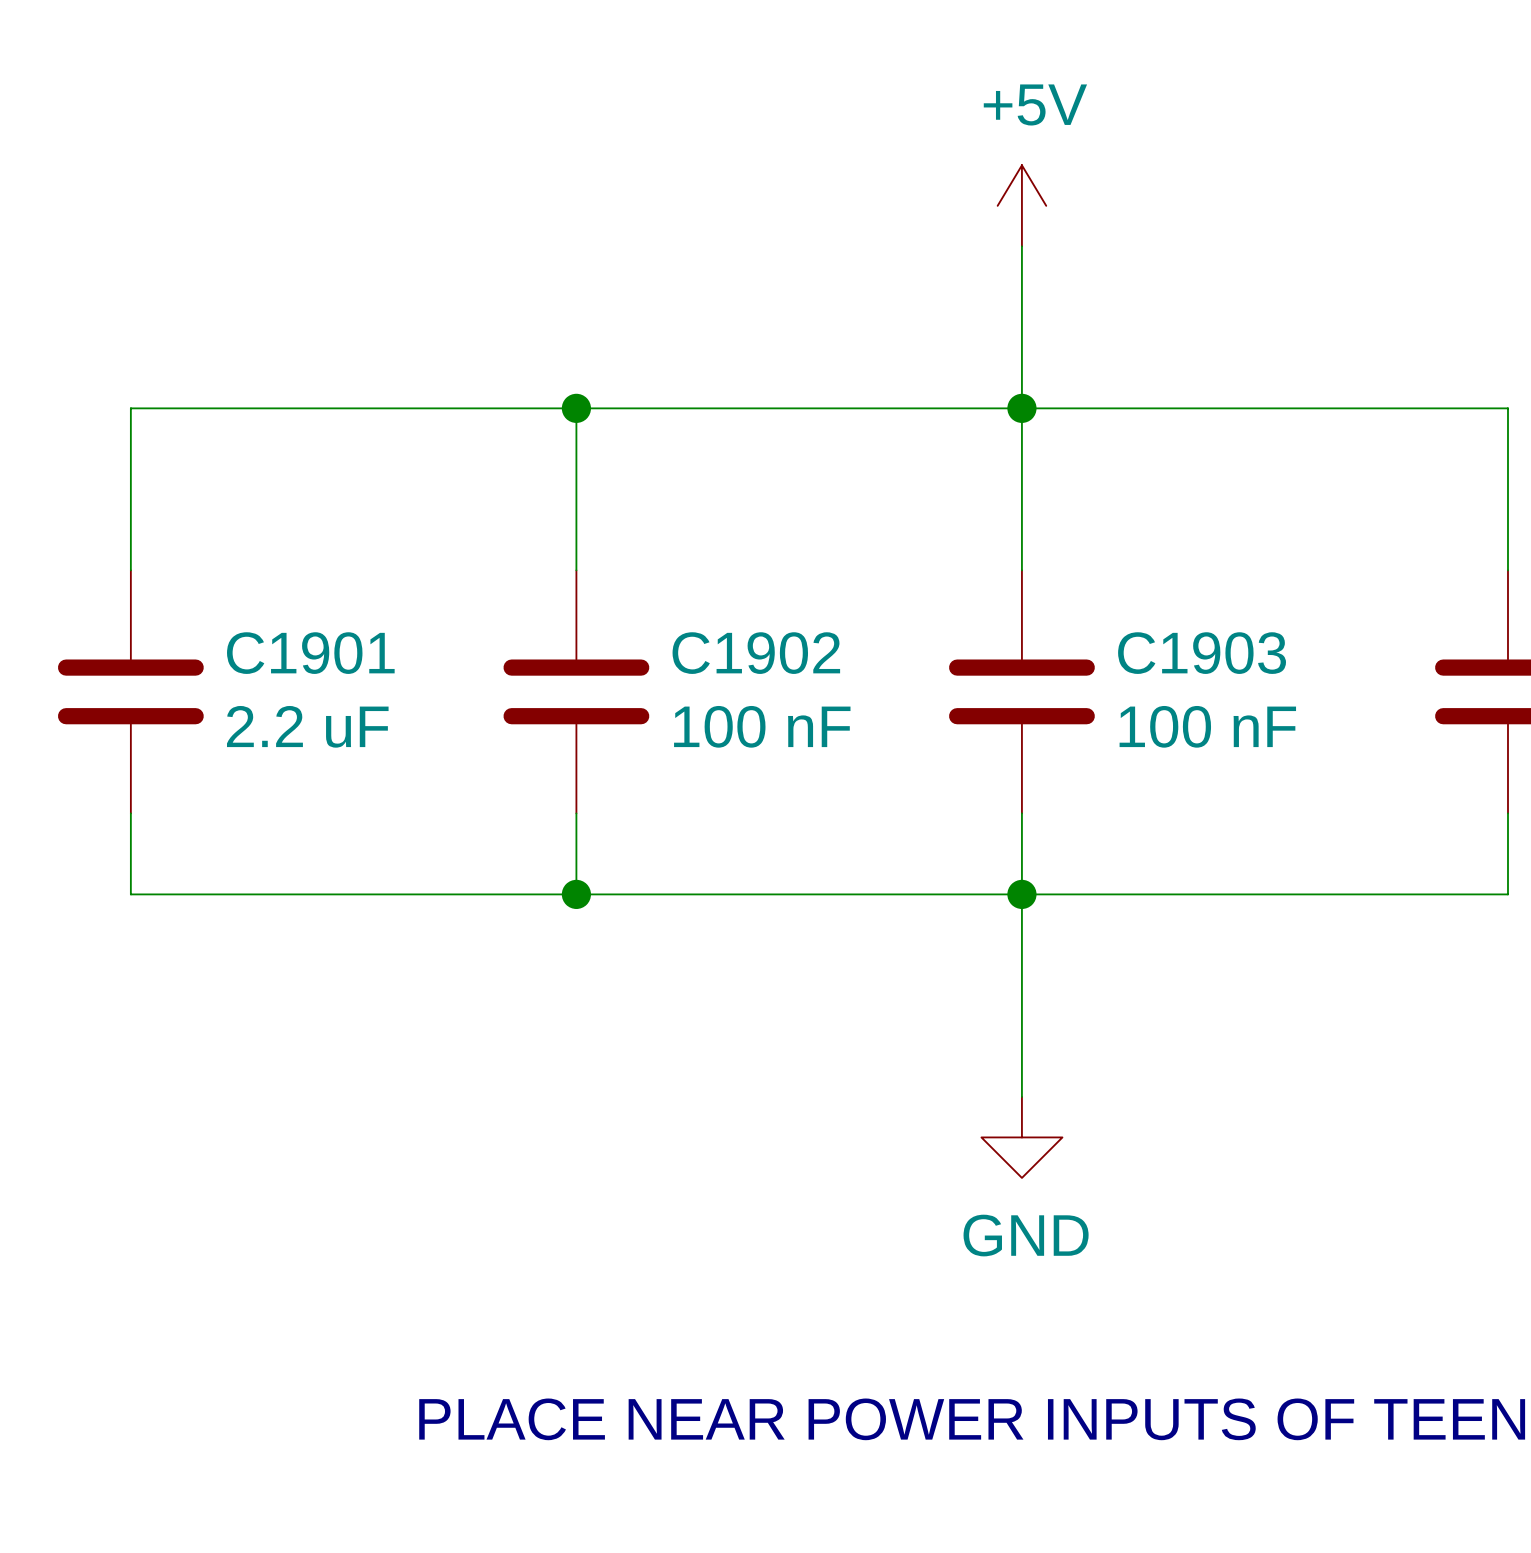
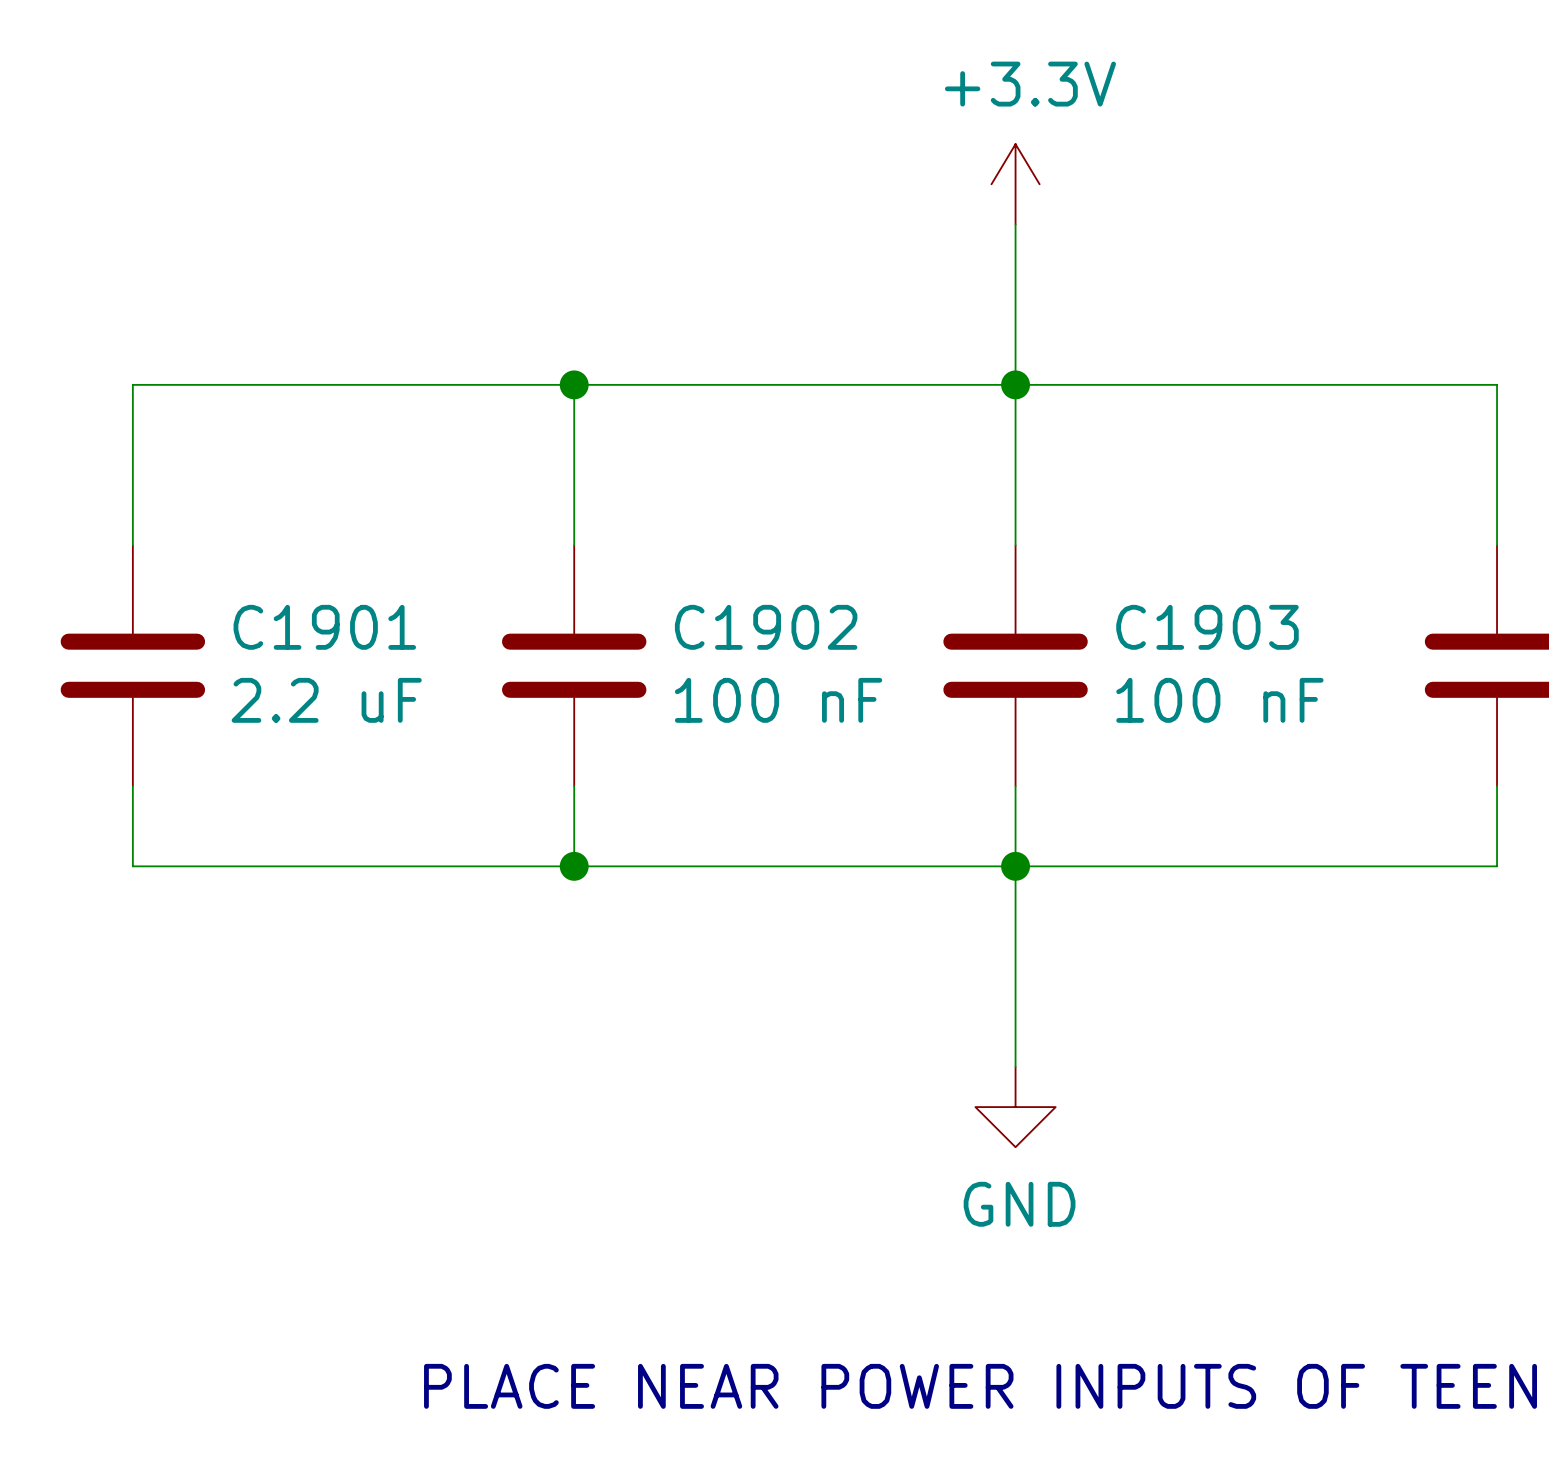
power symbol: +5V (1021, 205) -> +3.3V (1015, 184)

